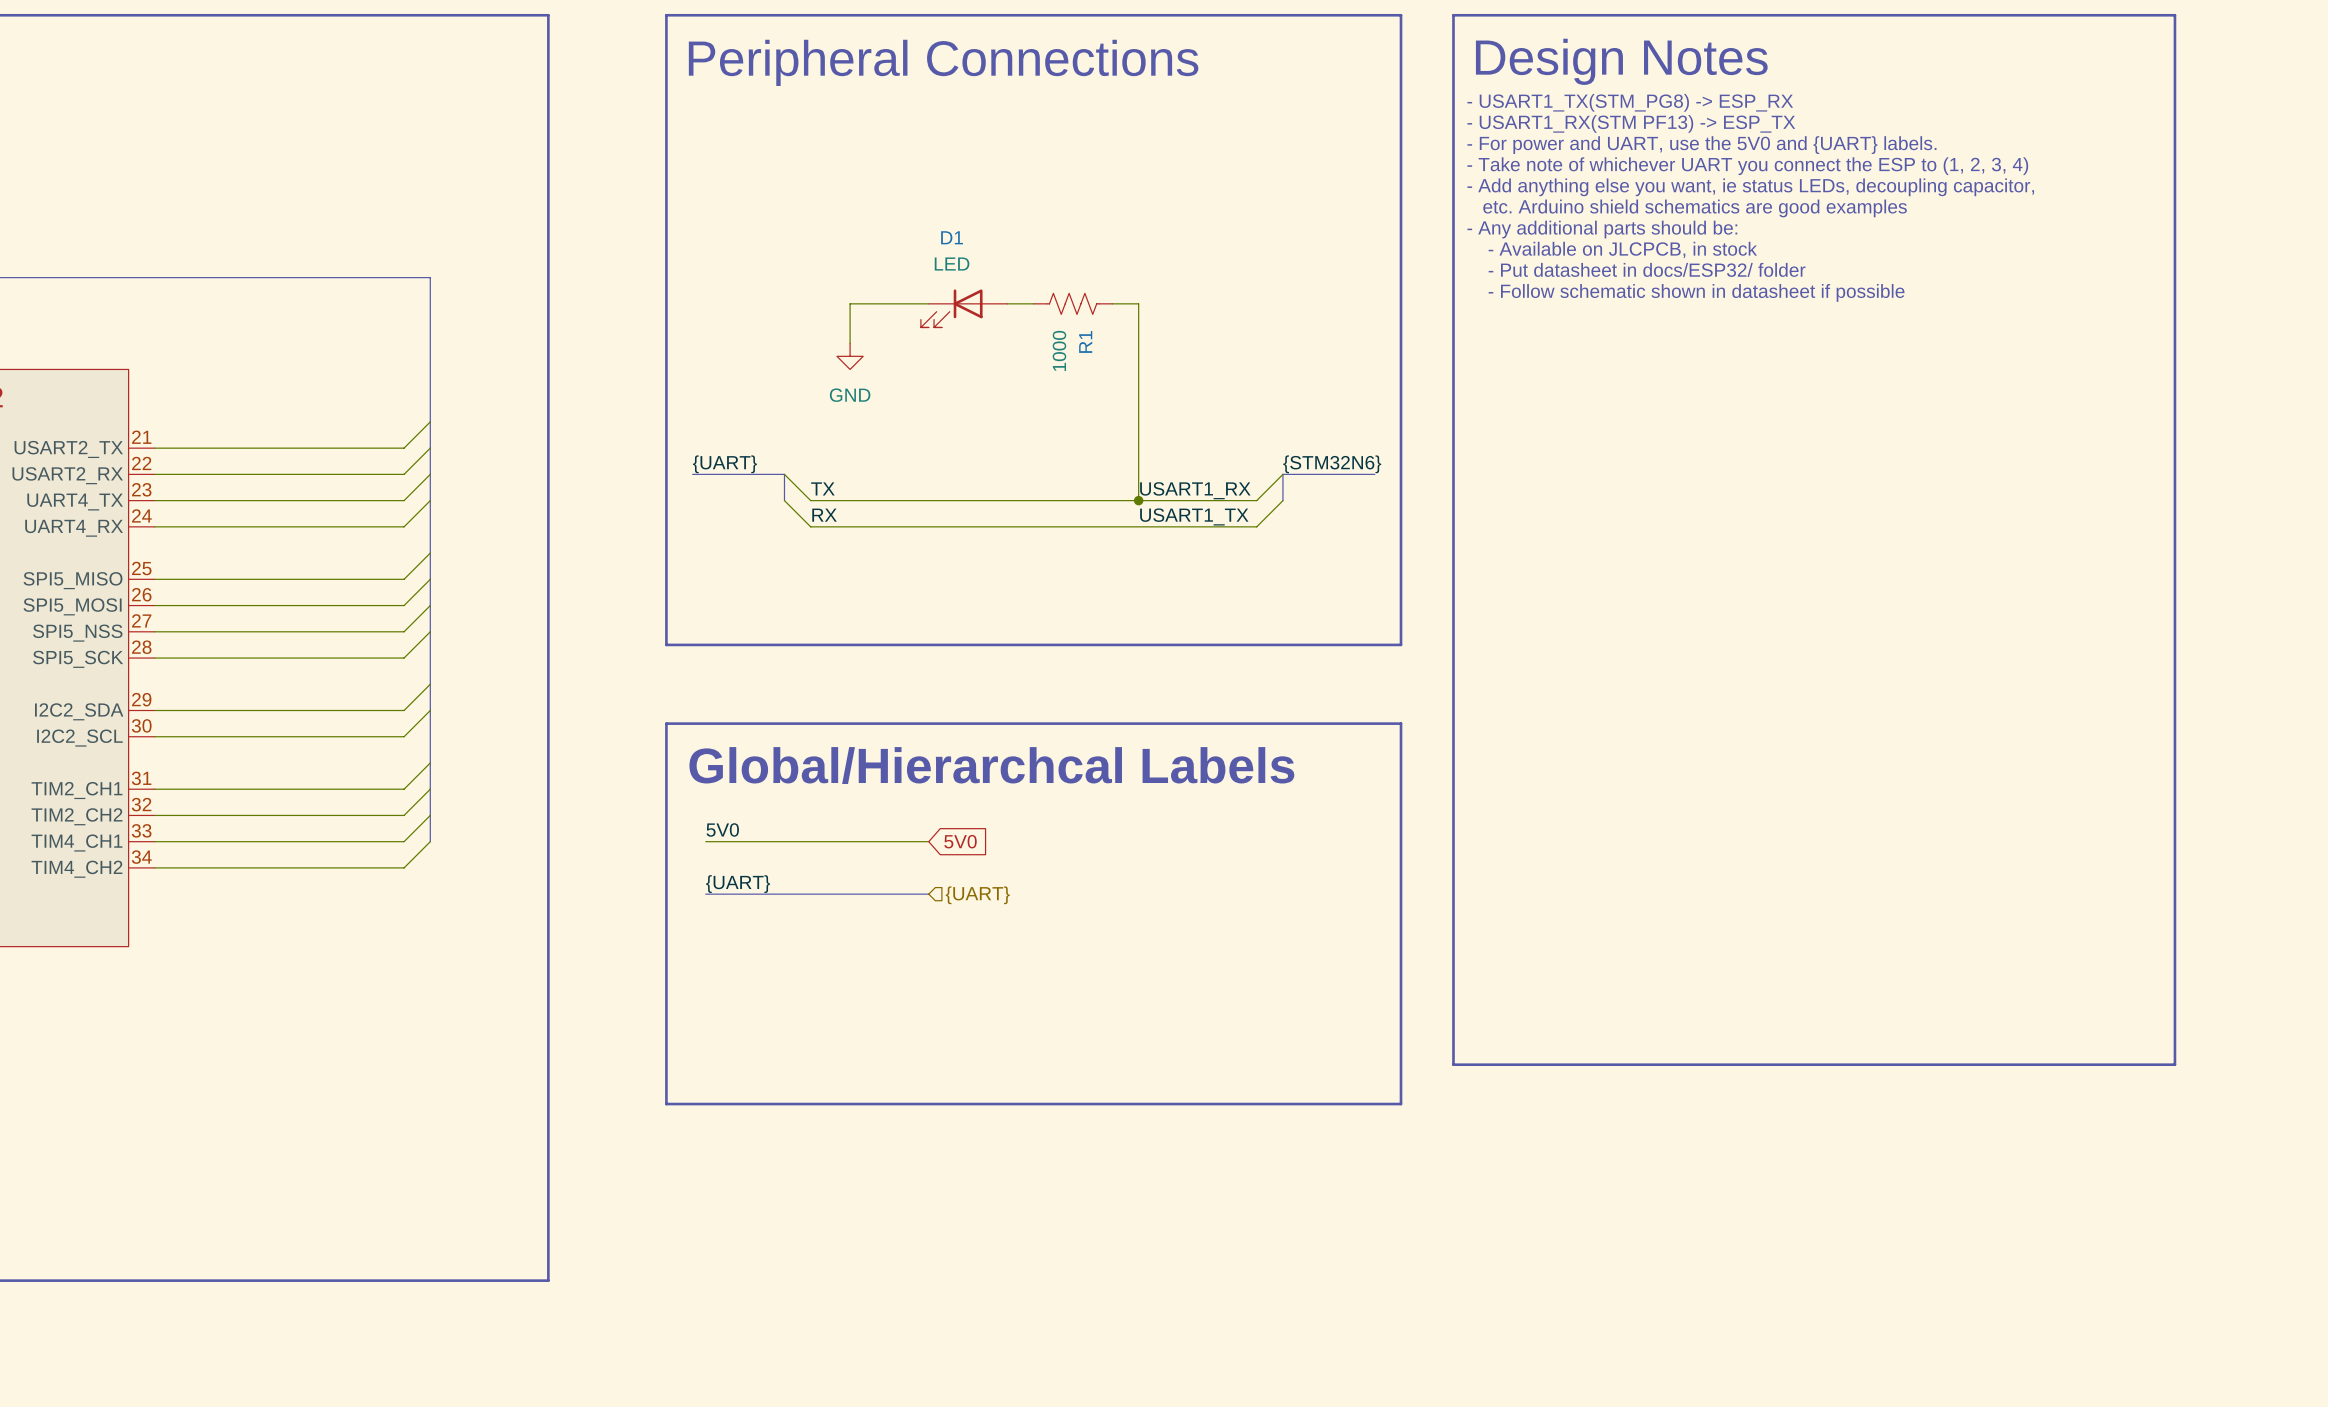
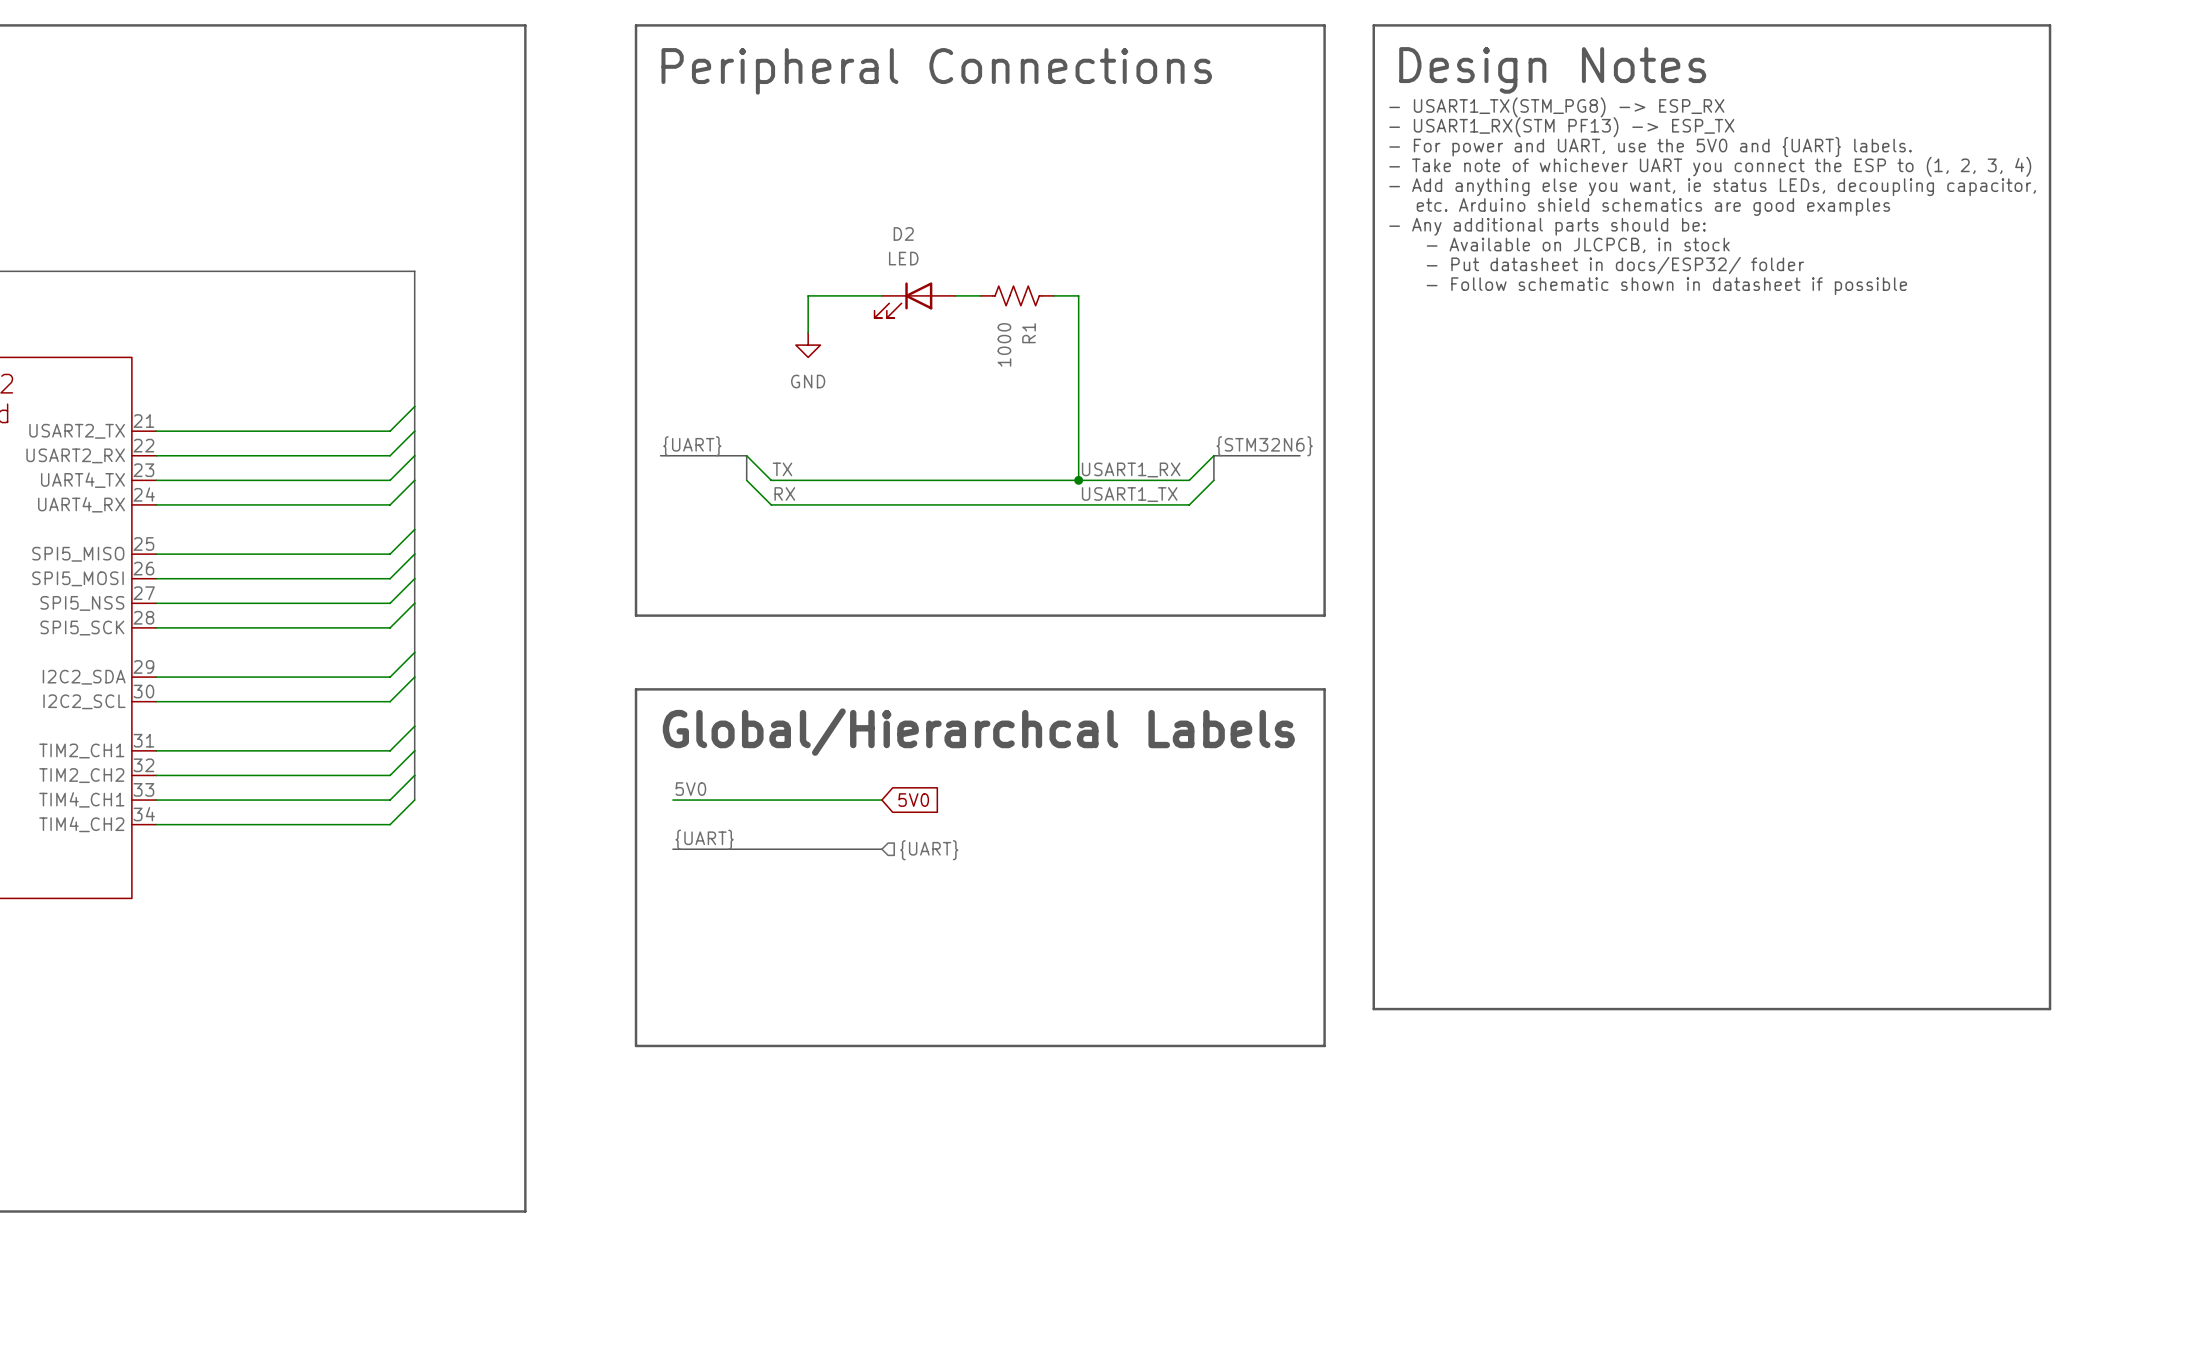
D1 name: D1 (952, 237) -> D2 (903, 233)

